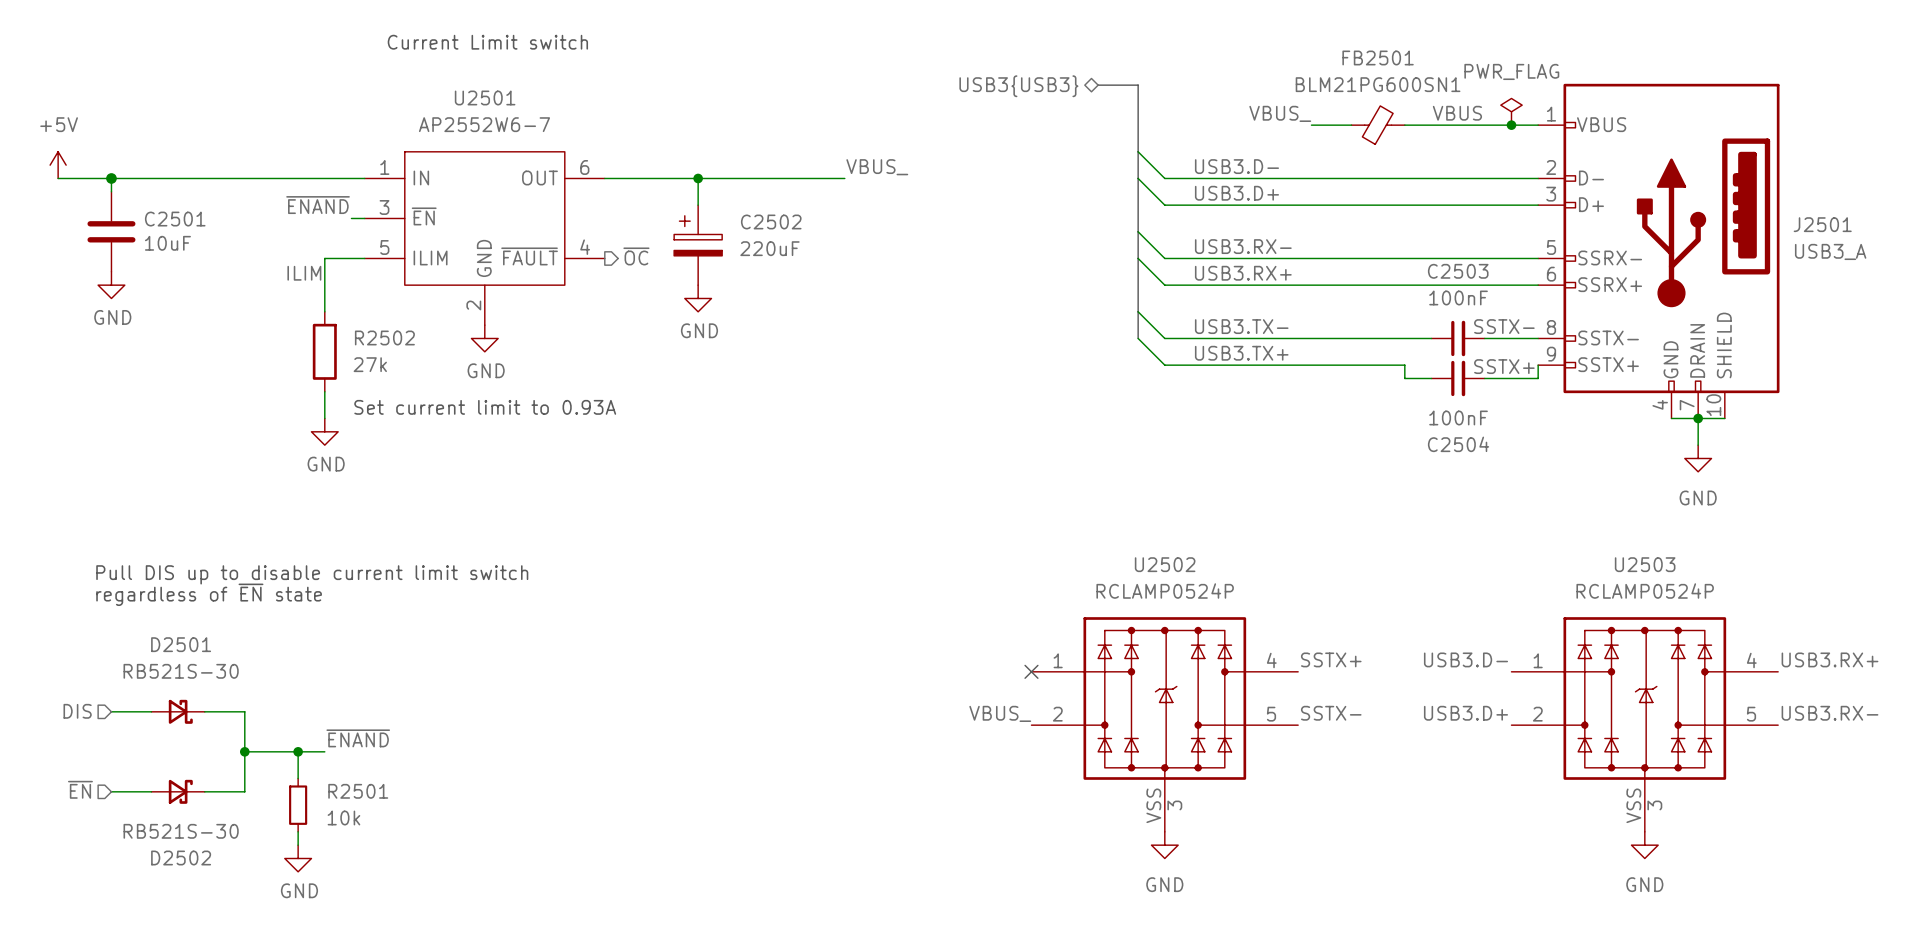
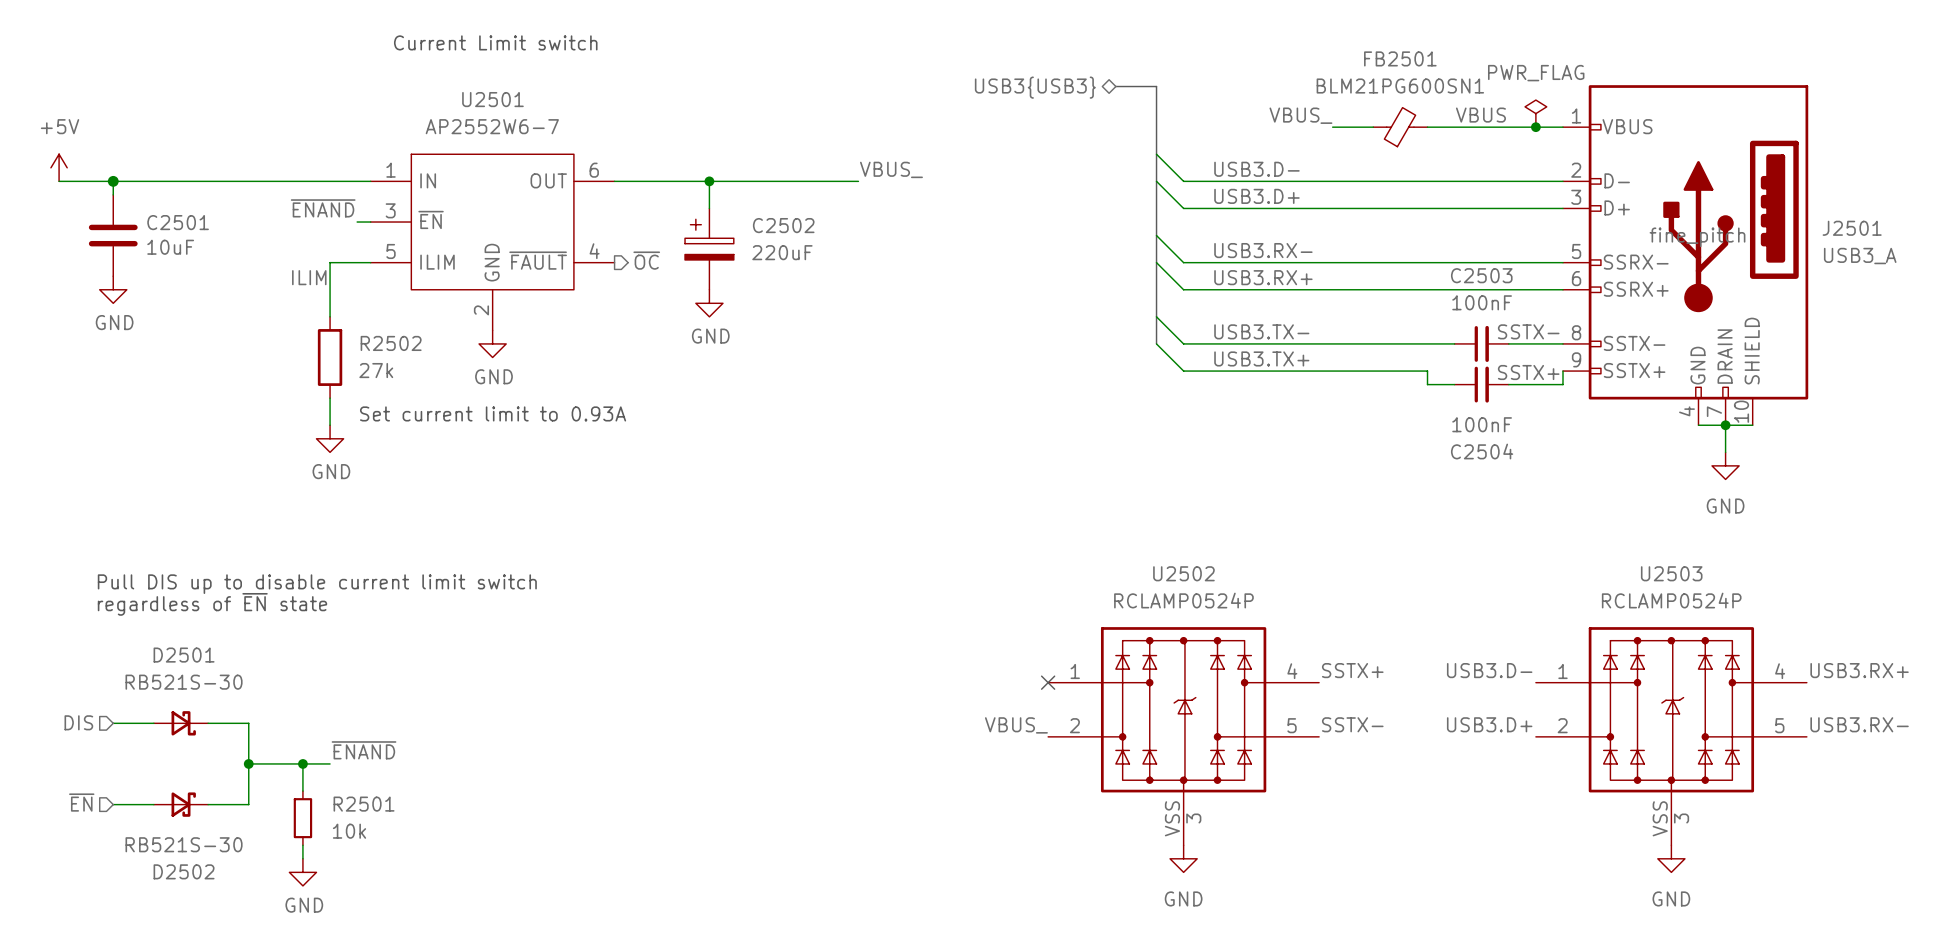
J2501 text: none -> fine_pitch (1697, 237)

